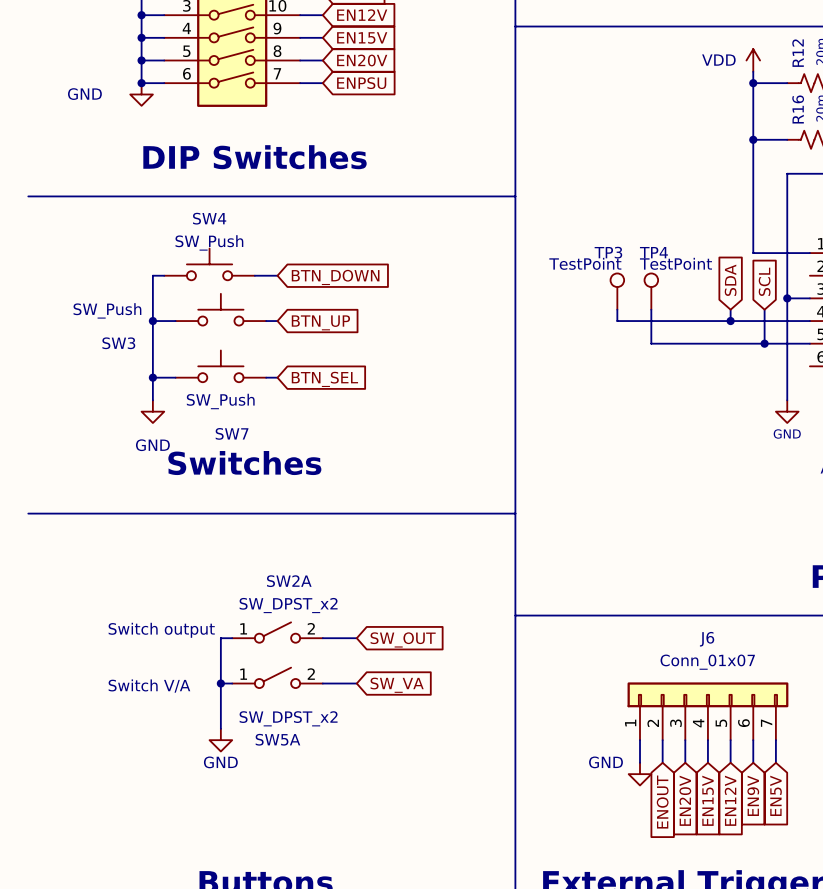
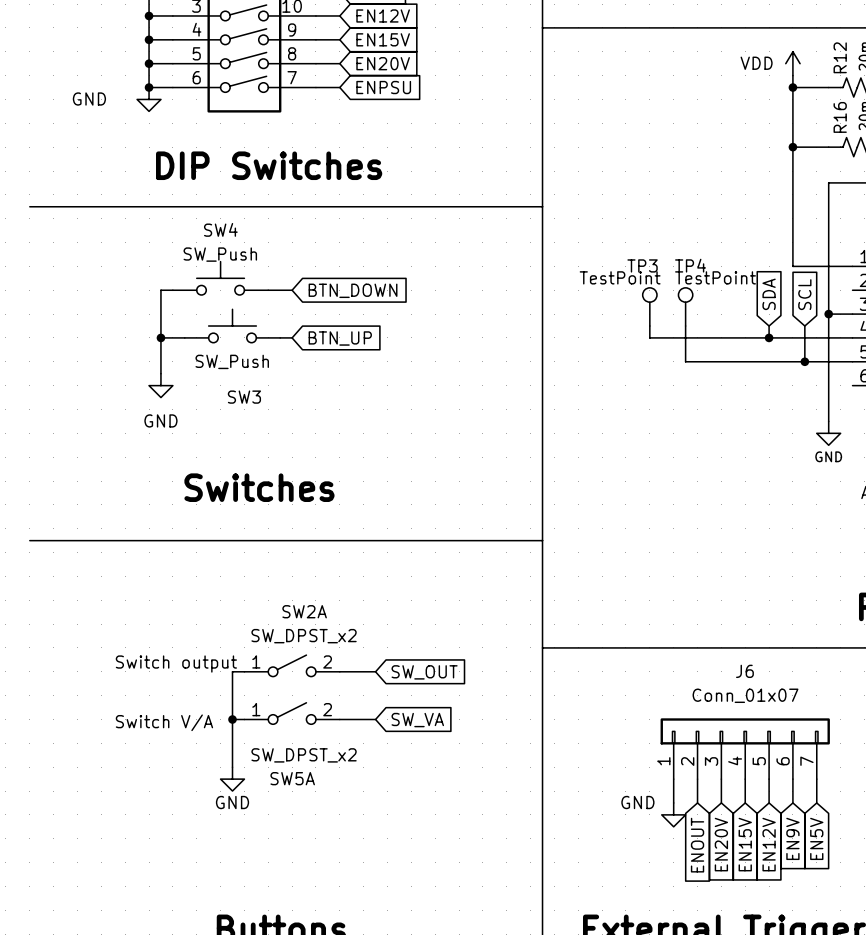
SW3 value position: SW_Push (107, 310) -> SW_Push (232, 361)
SW3 name position: SW3 (118, 343) -> SW3 (244, 397)
wire: (152, 355) (152, 400) -> none
SW7: SW_Push (220, 366) -> none
wire: (152, 377) (175, 377) -> none
junction: (152, 377) -> none
wire: (266, 377) (277, 377) -> none
global label: BTN_SEL (324, 379) -> none
power symbol position: GND (152, 411) -> GND (160, 385)

